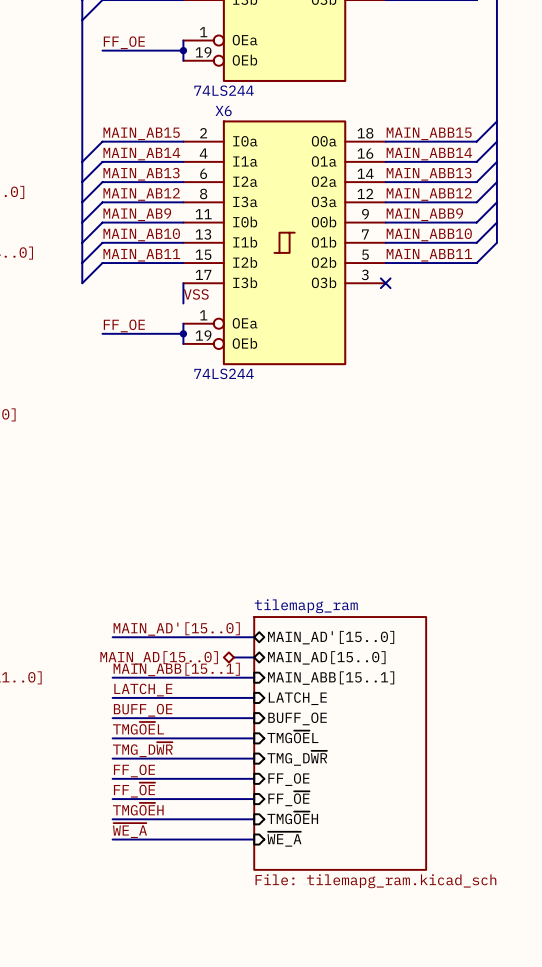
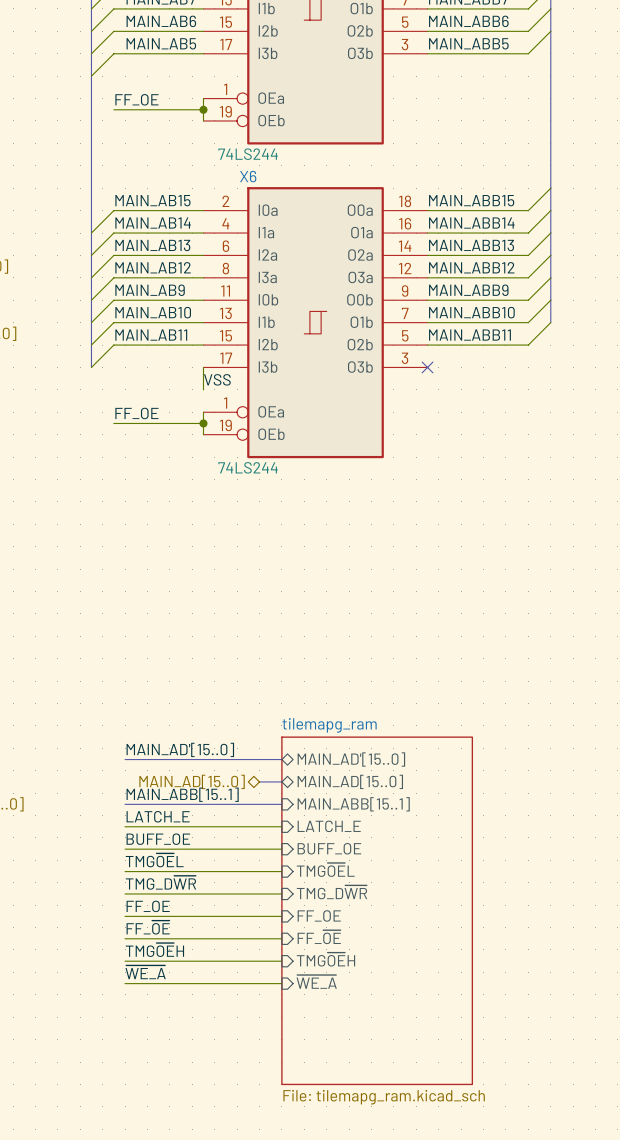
sheet tilemapg_ram: File: tilemapg_ram.kicad_sch (340, 743) -> none
sheet tilemapg_ram: none -> File: tilemapg_ram.kicad_sch (377, 910)

